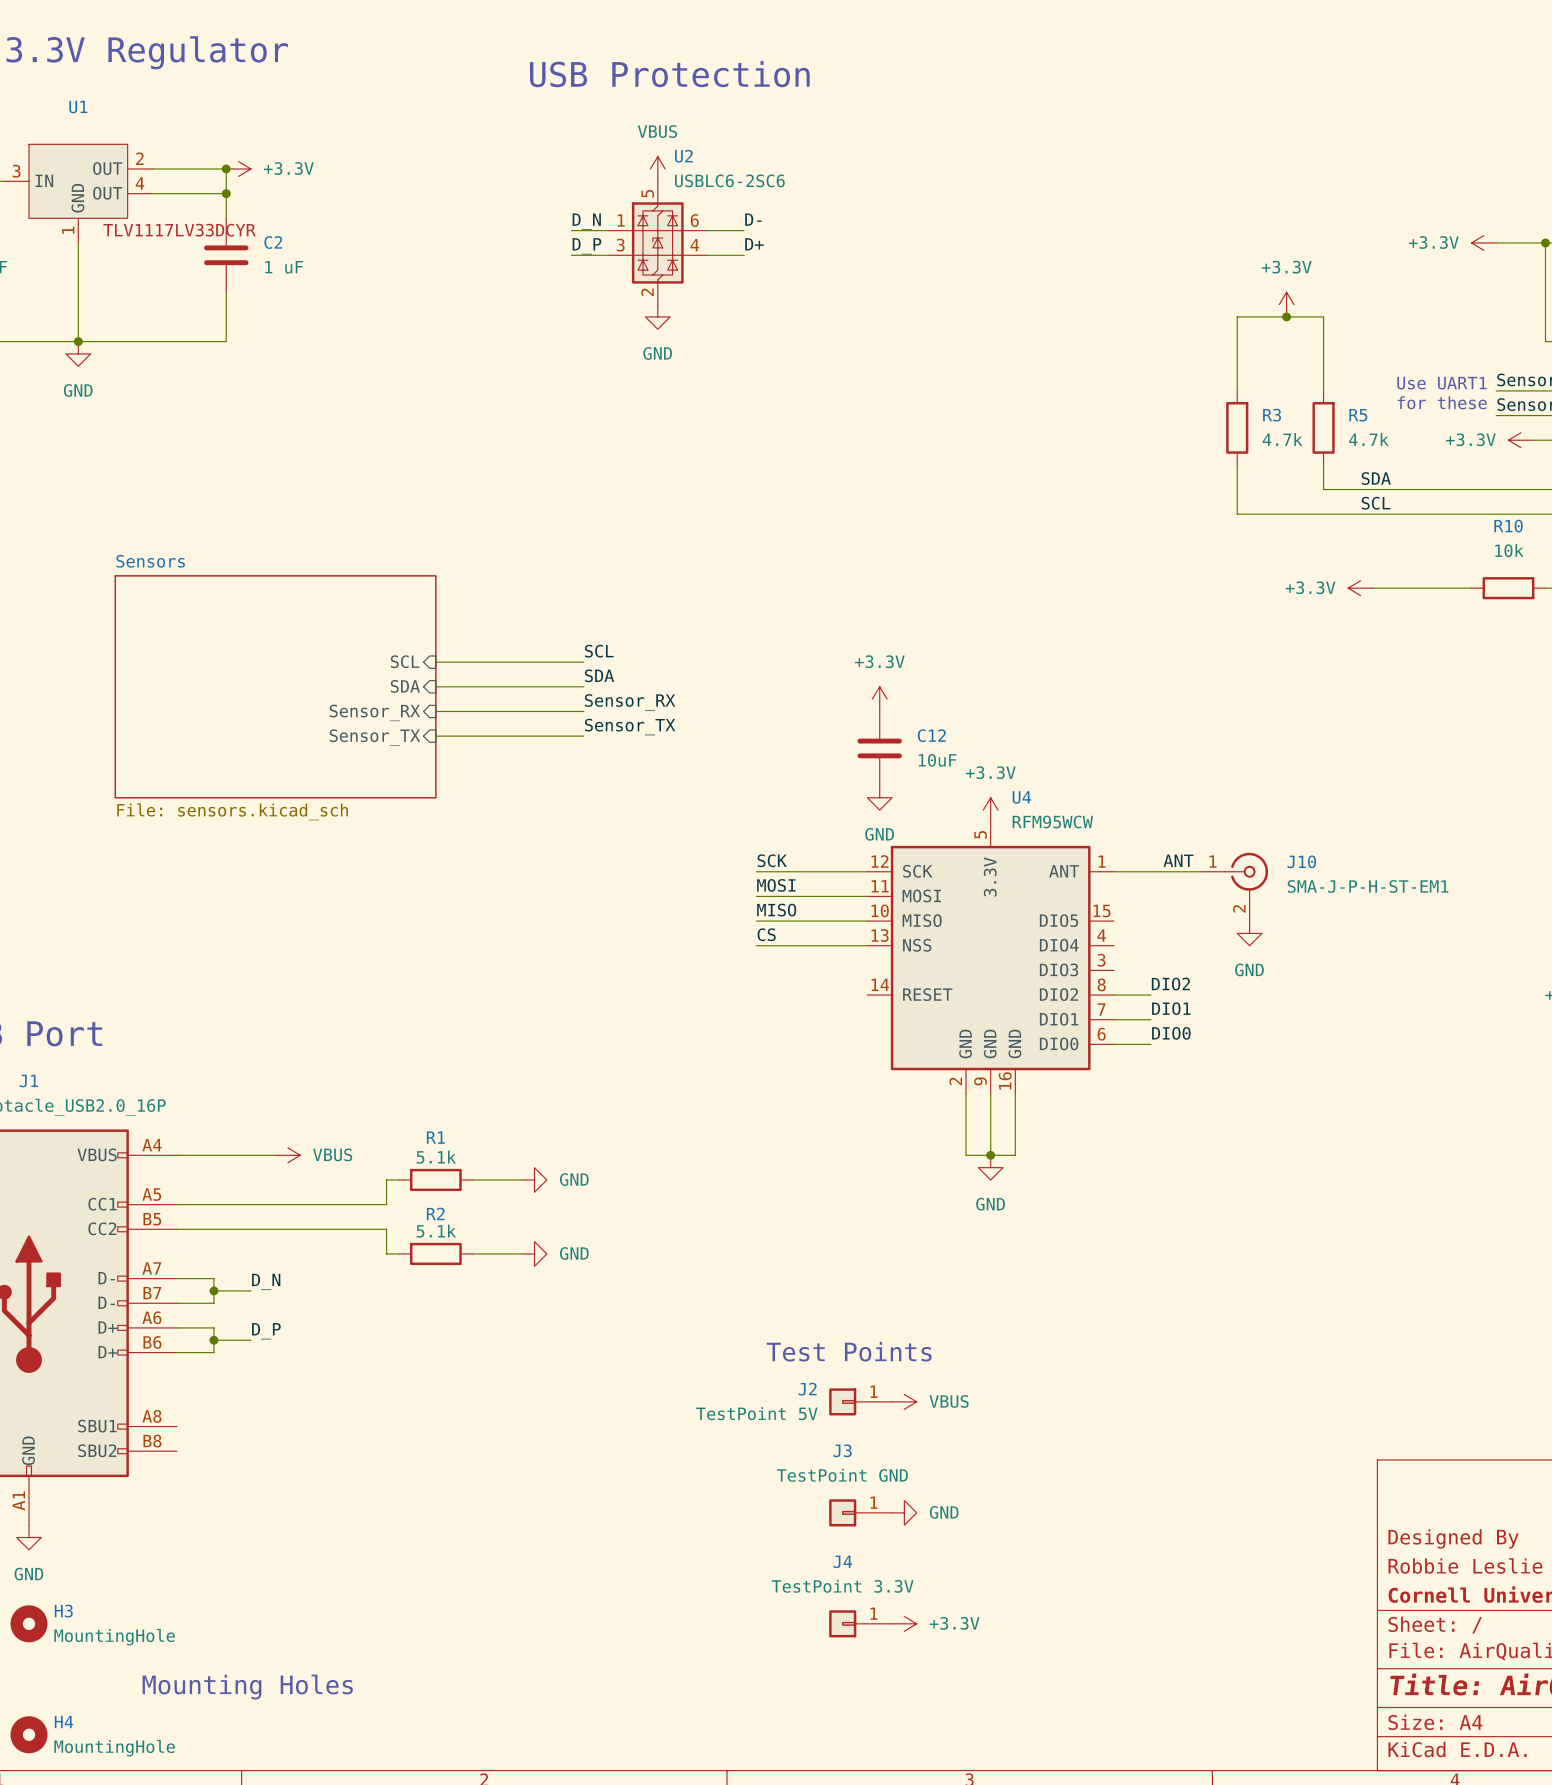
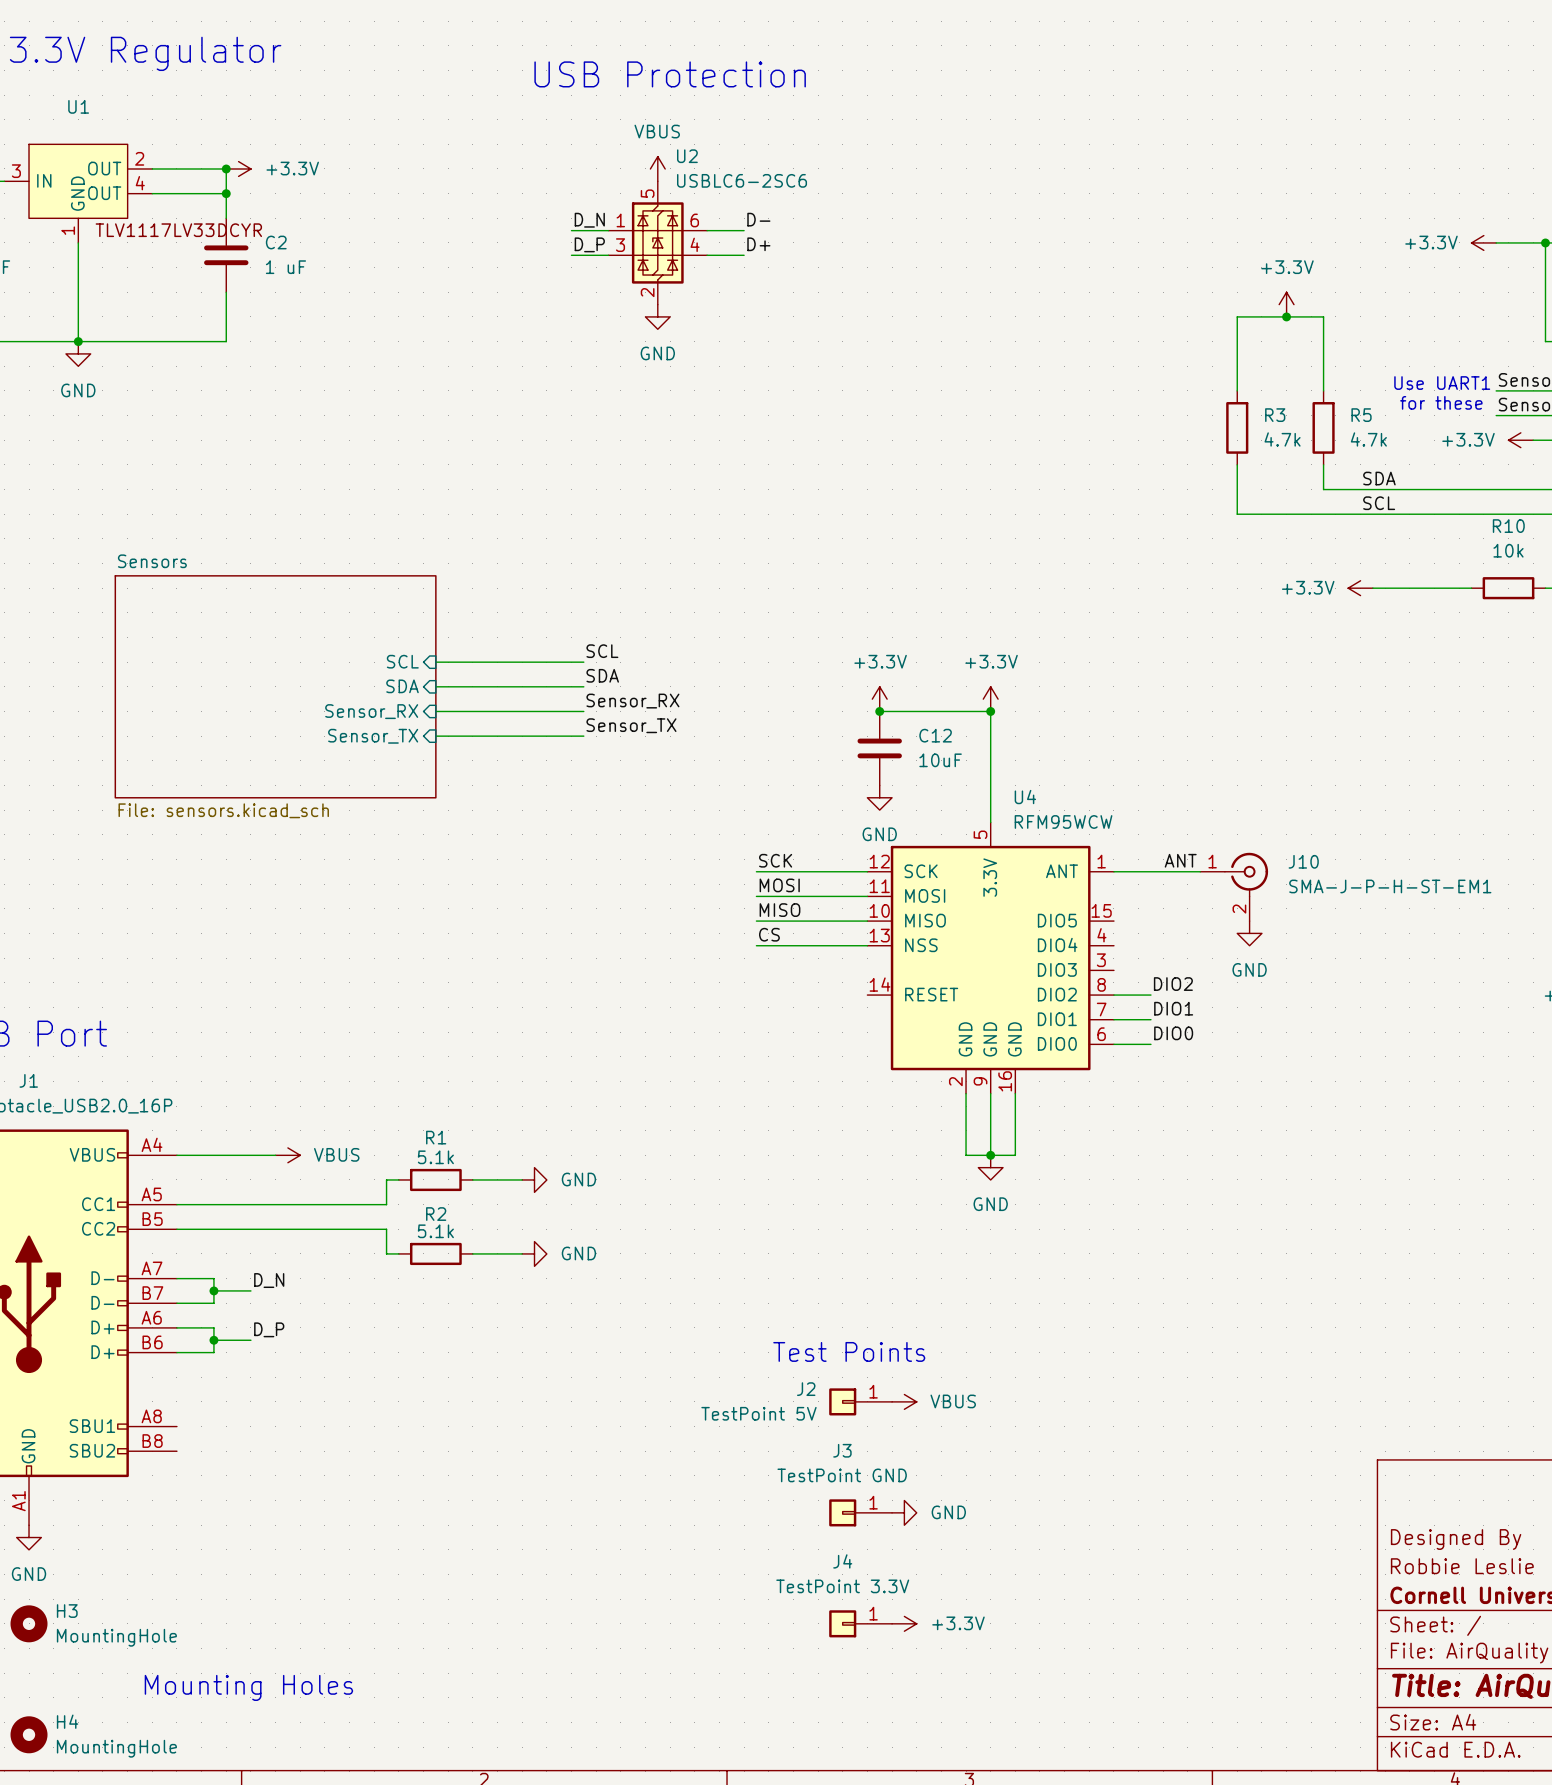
wire: none -> (879, 711) (990, 711) (990, 822)
junction: none -> (879, 711)
junction: none -> (990, 711)
power symbol position: +3.3V (990, 810) -> +3.3V (990, 699)

